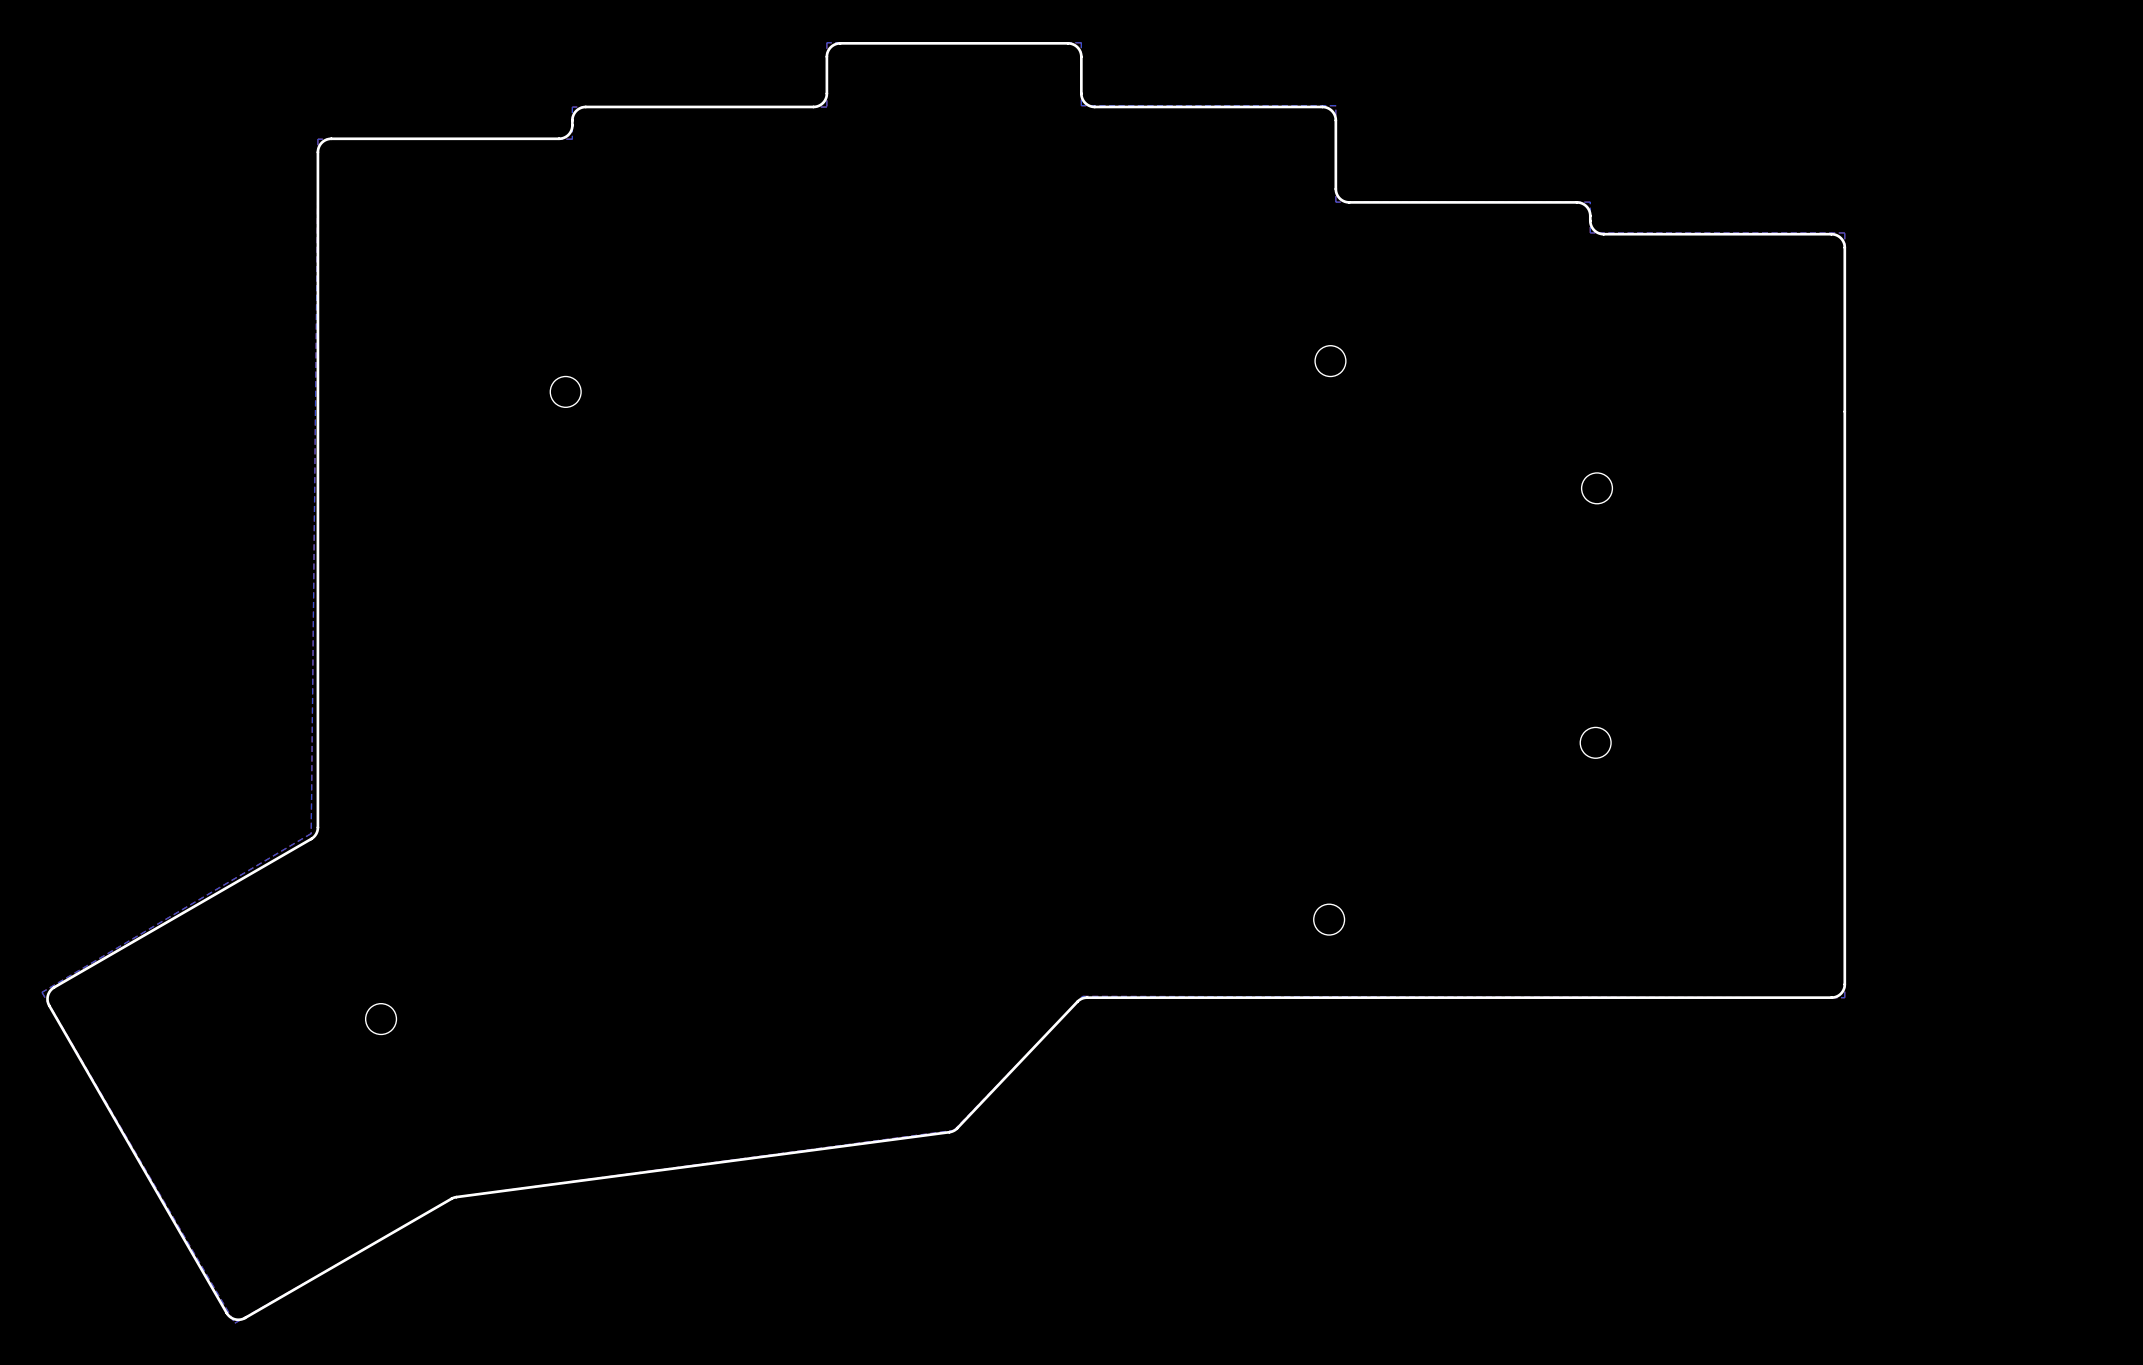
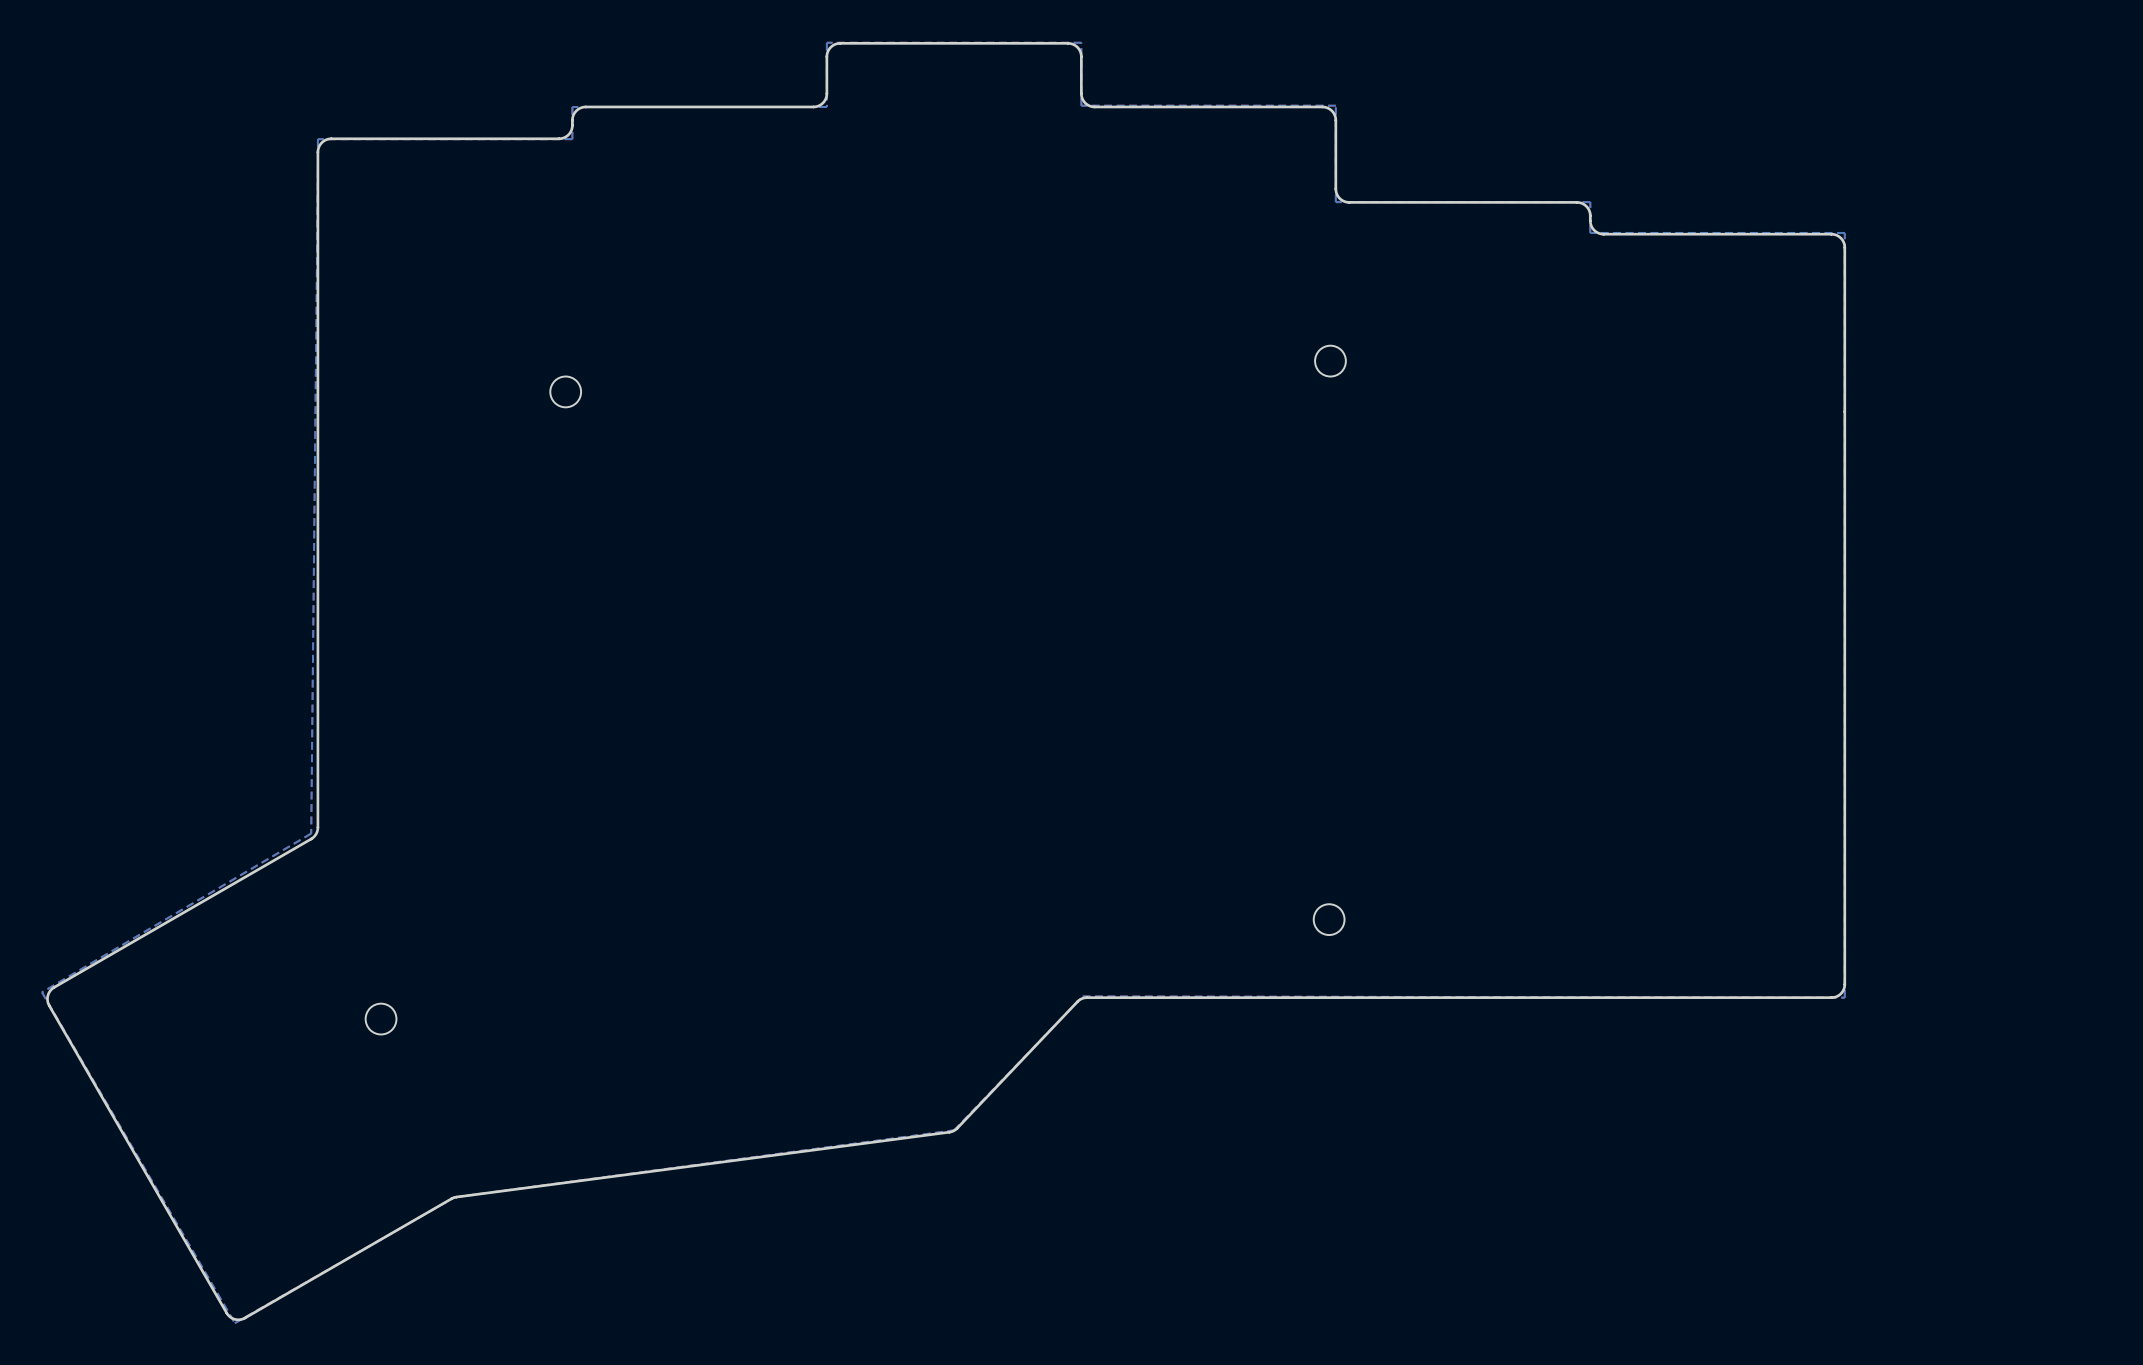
drawing: [1580, 472, 1614, 505] -> none
drawing: [1579, 726, 1612, 759] -> none

